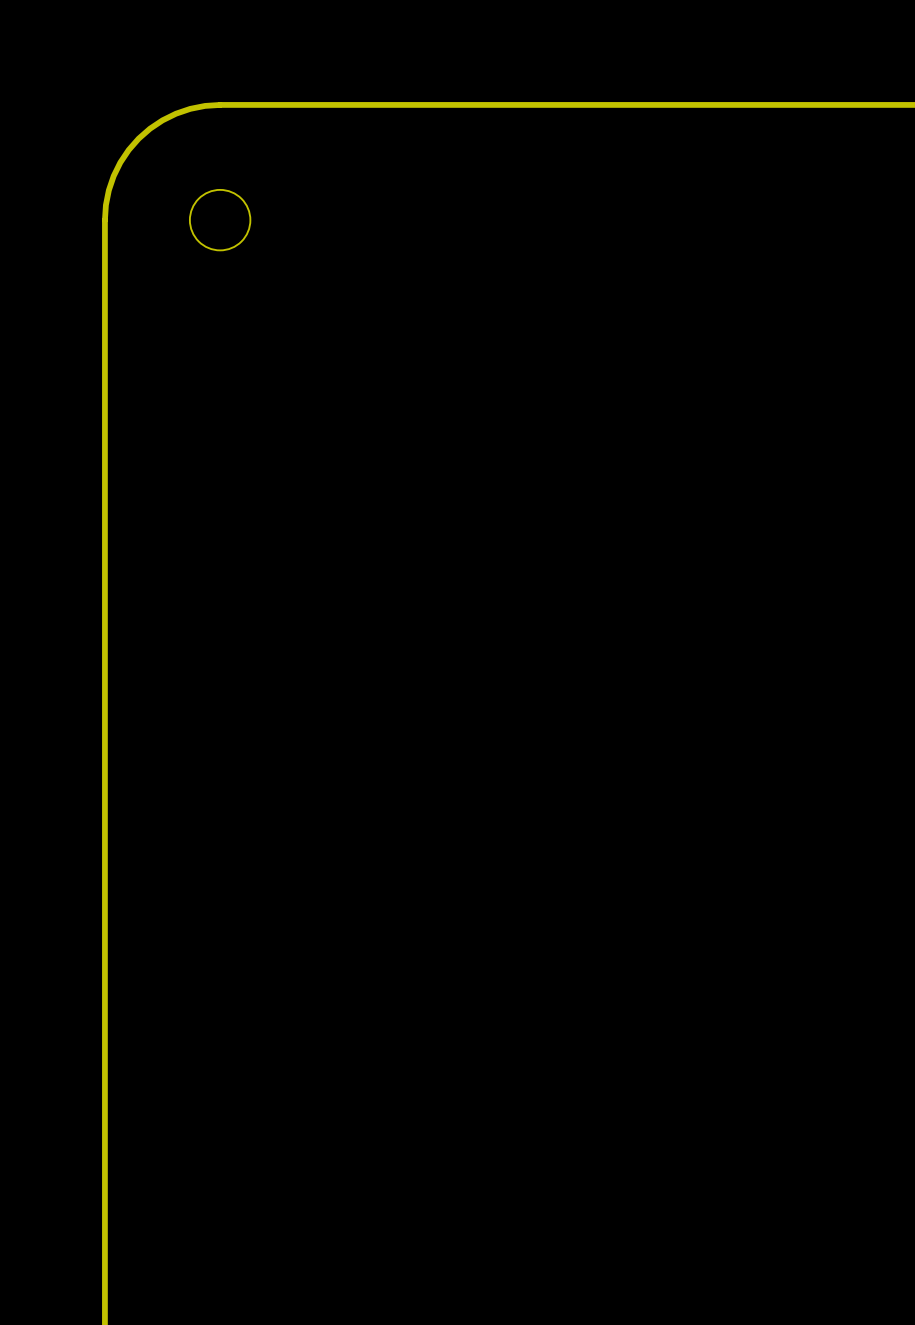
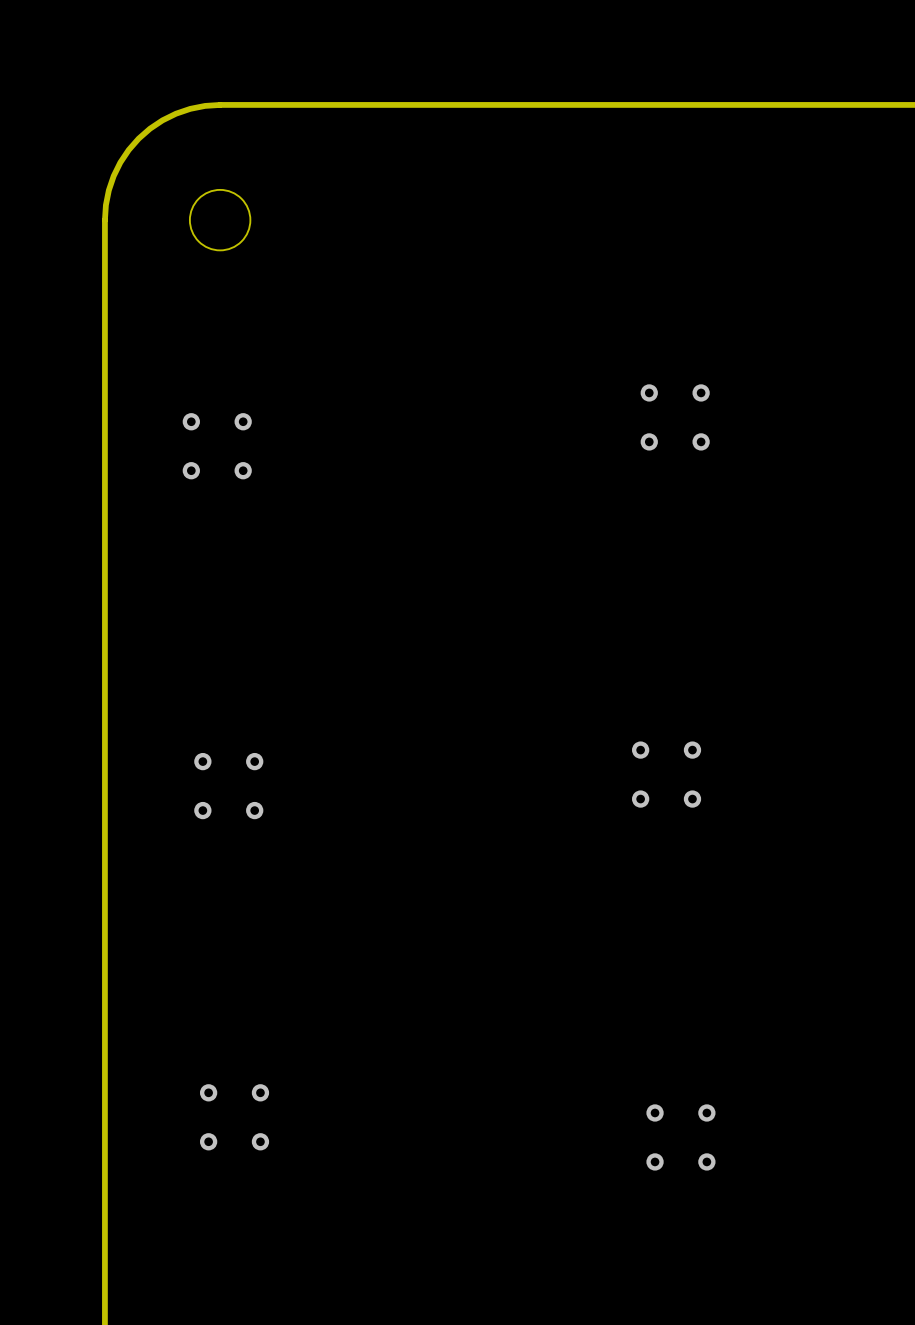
via: none -> (649, 392)
via: none -> (701, 392)
via: none -> (191, 421)
via: none -> (243, 421)
via: none -> (649, 441)
via: none -> (701, 441)
via: none -> (191, 470)
via: none -> (243, 470)
via: none -> (640, 750)
via: none -> (692, 750)
via: none -> (202, 761)
via: none -> (254, 761)
via: none -> (640, 799)
via: none -> (692, 799)
via: none -> (202, 810)
via: none -> (254, 810)
via: none -> (208, 1092)
via: none -> (260, 1092)
via: none -> (655, 1112)
via: none -> (706, 1112)
via: none -> (208, 1141)
via: none -> (260, 1141)
via: none -> (655, 1161)
via: none -> (706, 1161)

